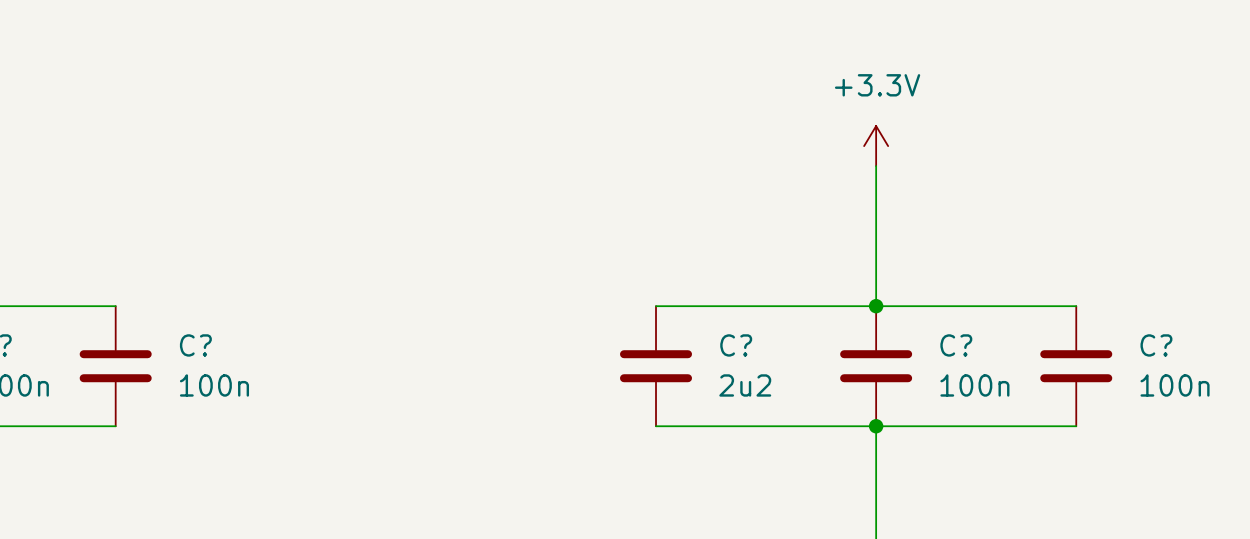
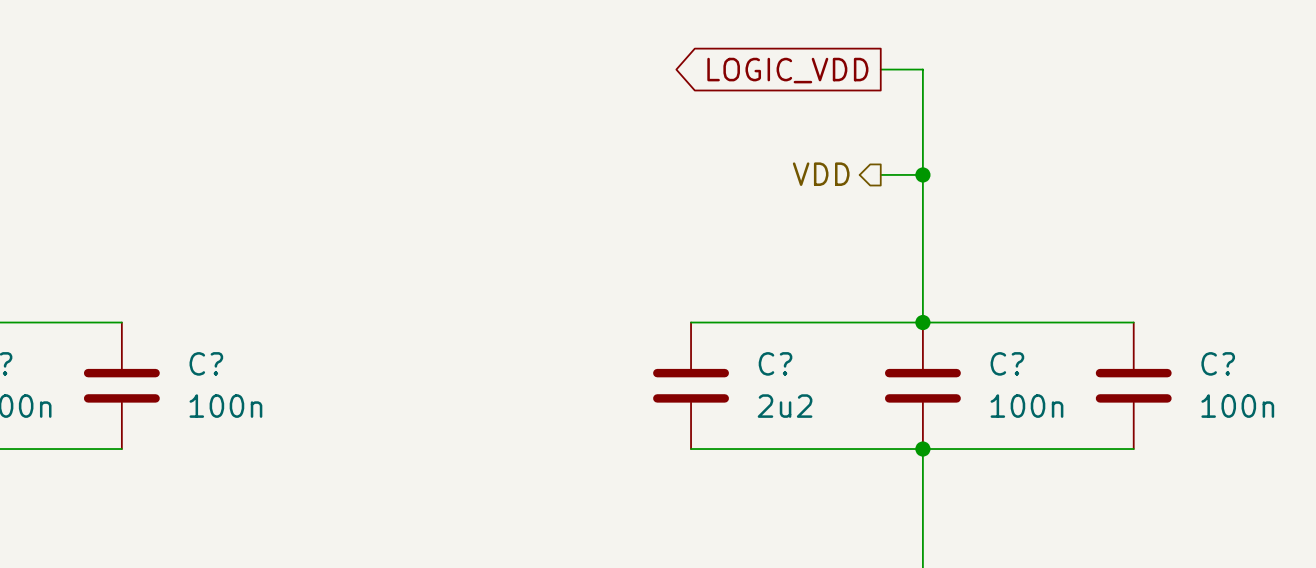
global label: none -> LOGIC_VDD (787, 70)
wire: none -> (880, 69) (922, 69) (922, 174) (880, 174)
power symbol: +3.3V (876, 146) -> none
hierarchical label: none -> VDD (821, 174)
junction: none -> (922, 174)

